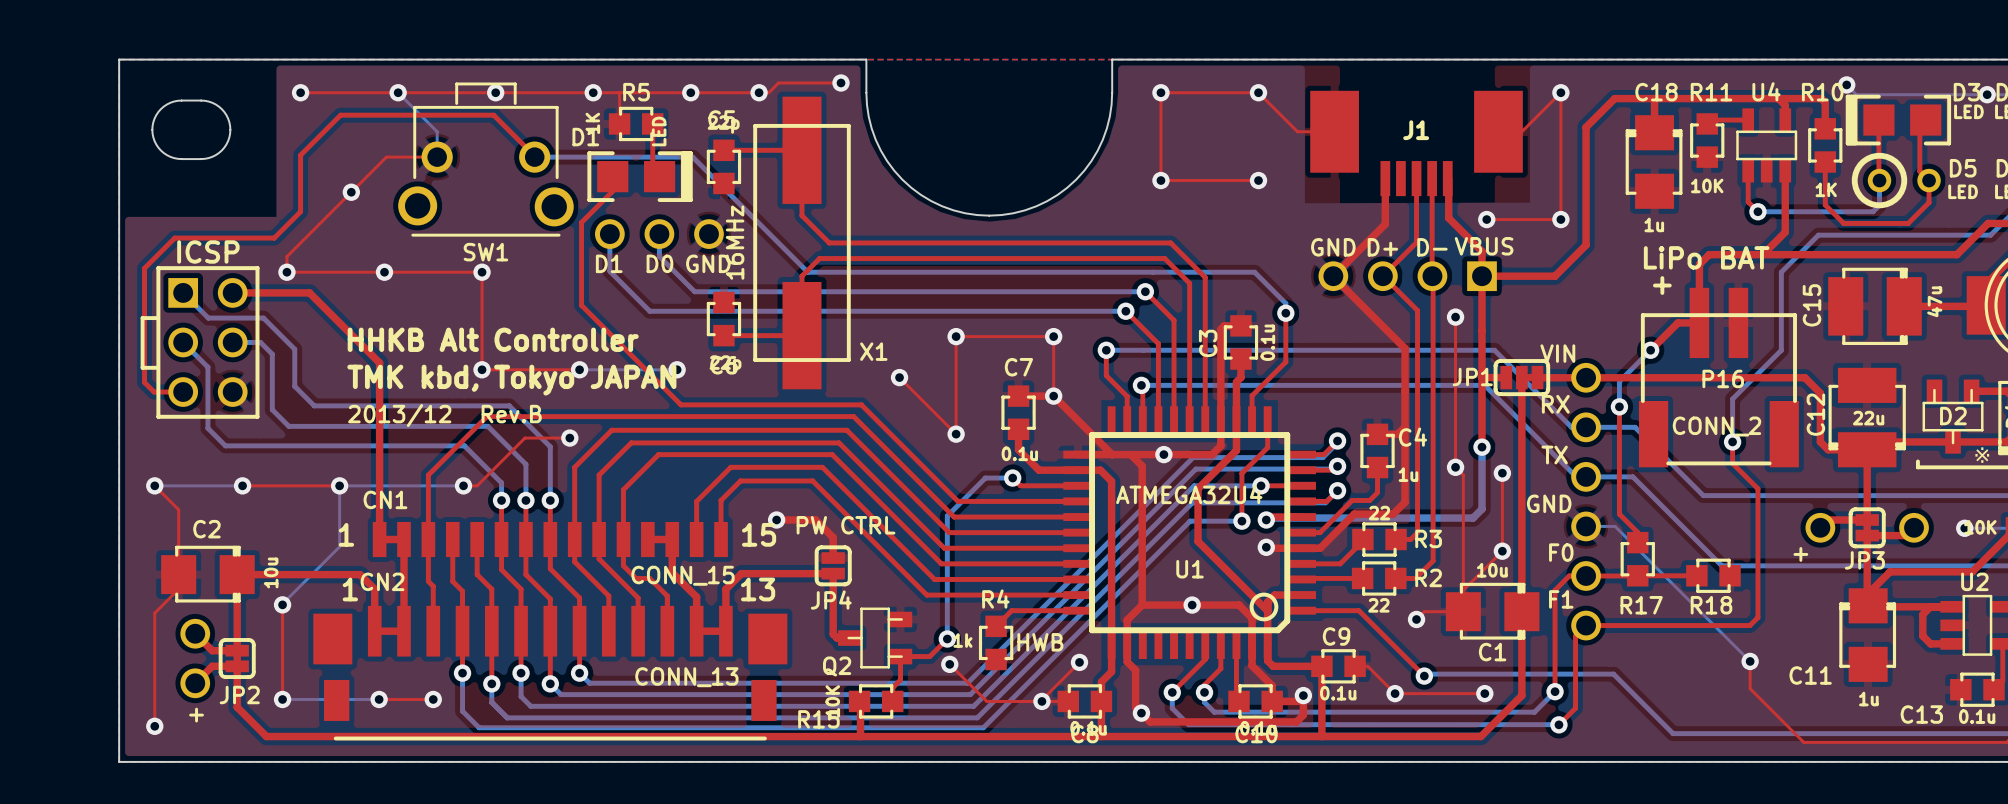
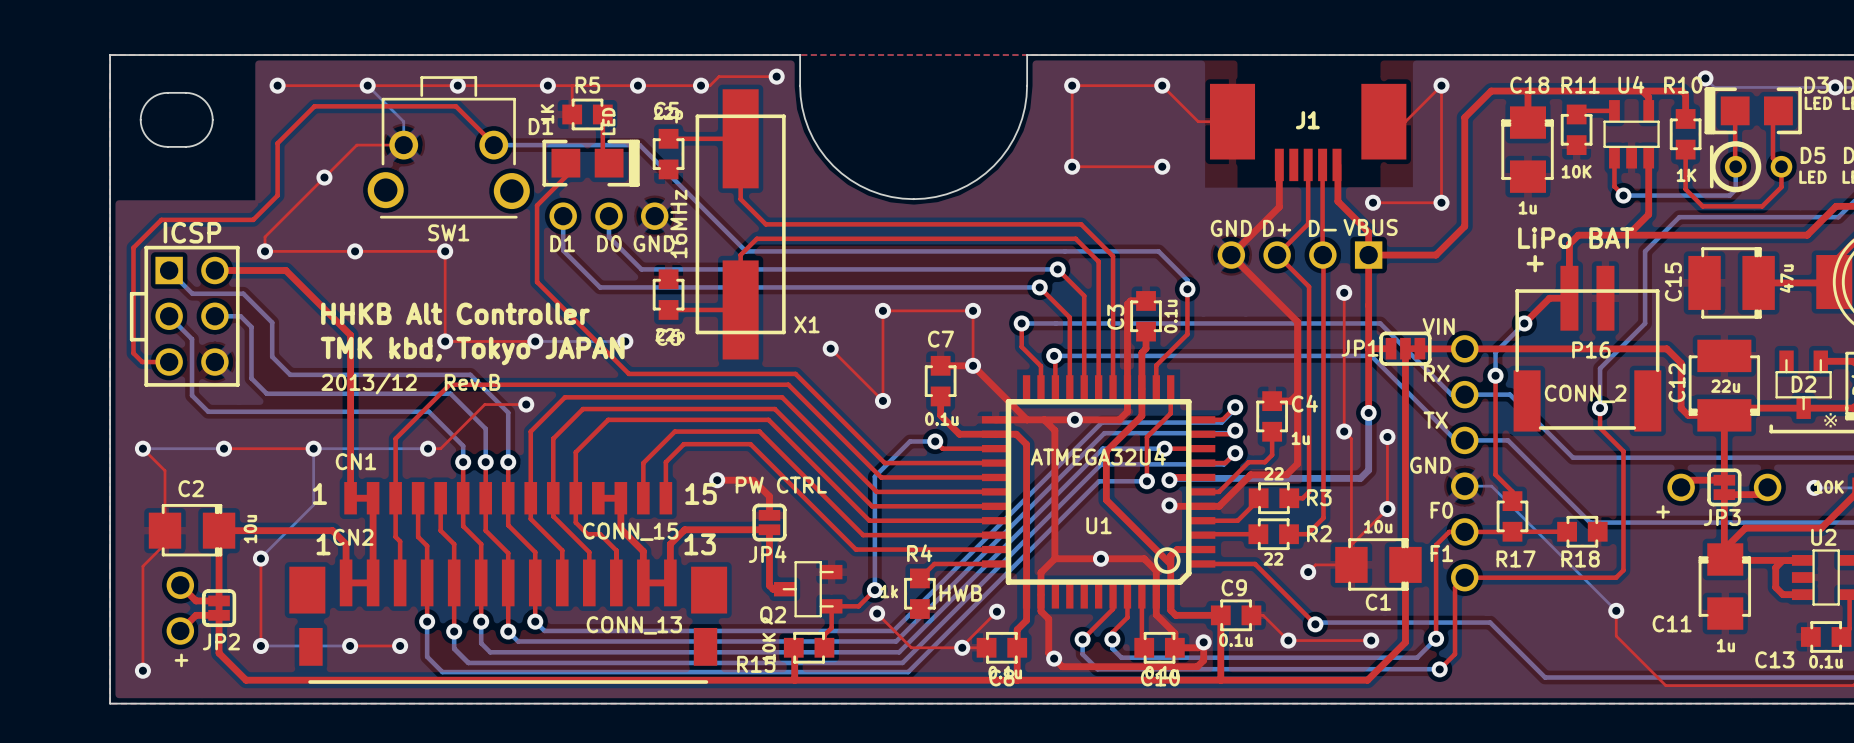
line: none -> (1711, 146) (1711, 186)

